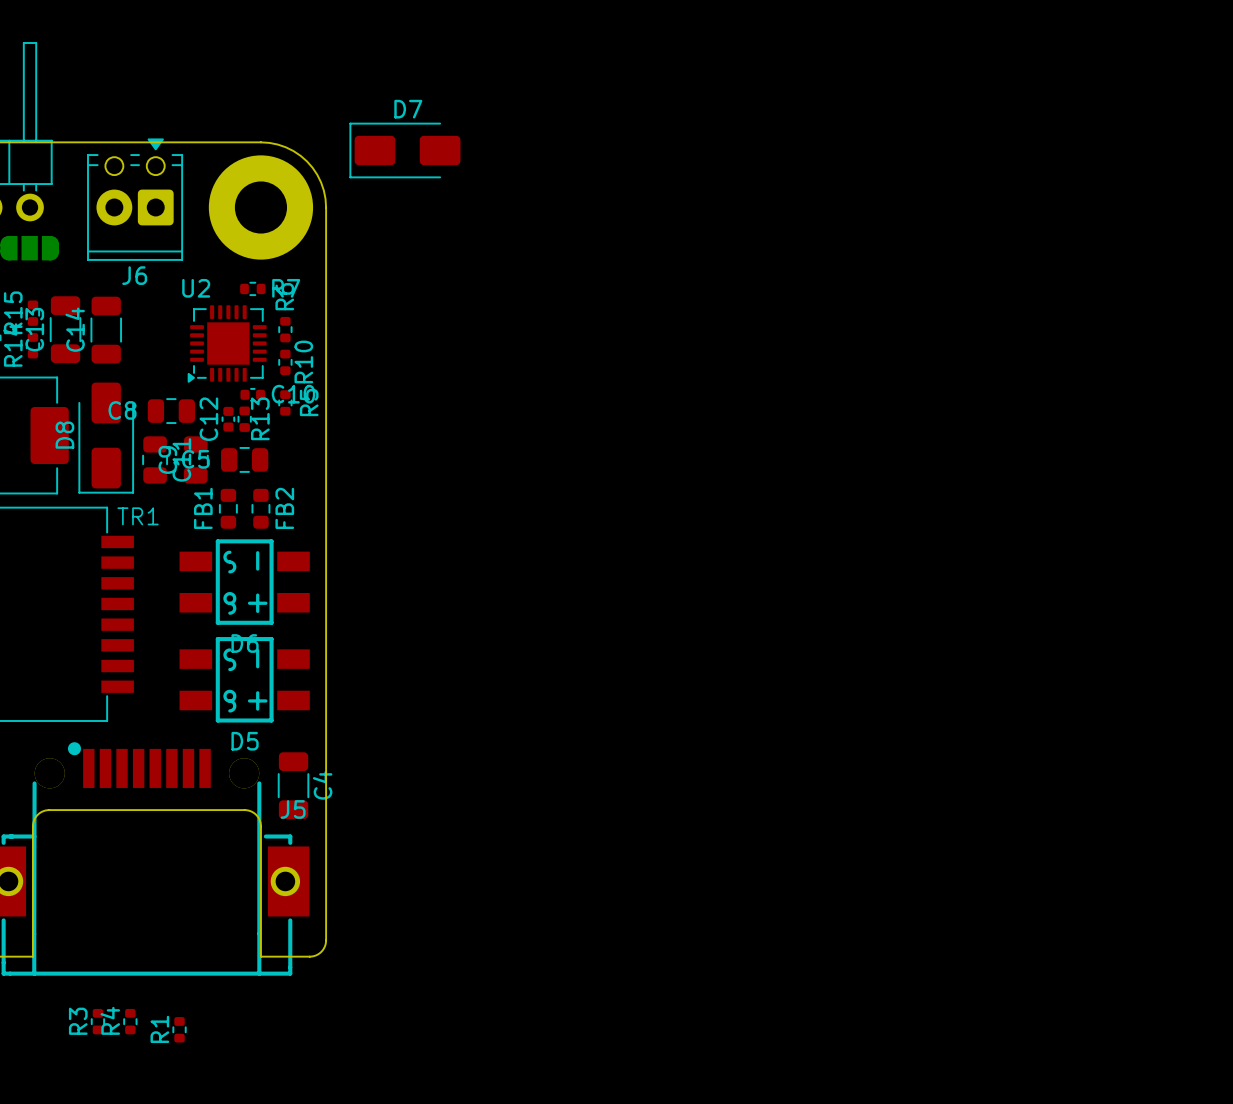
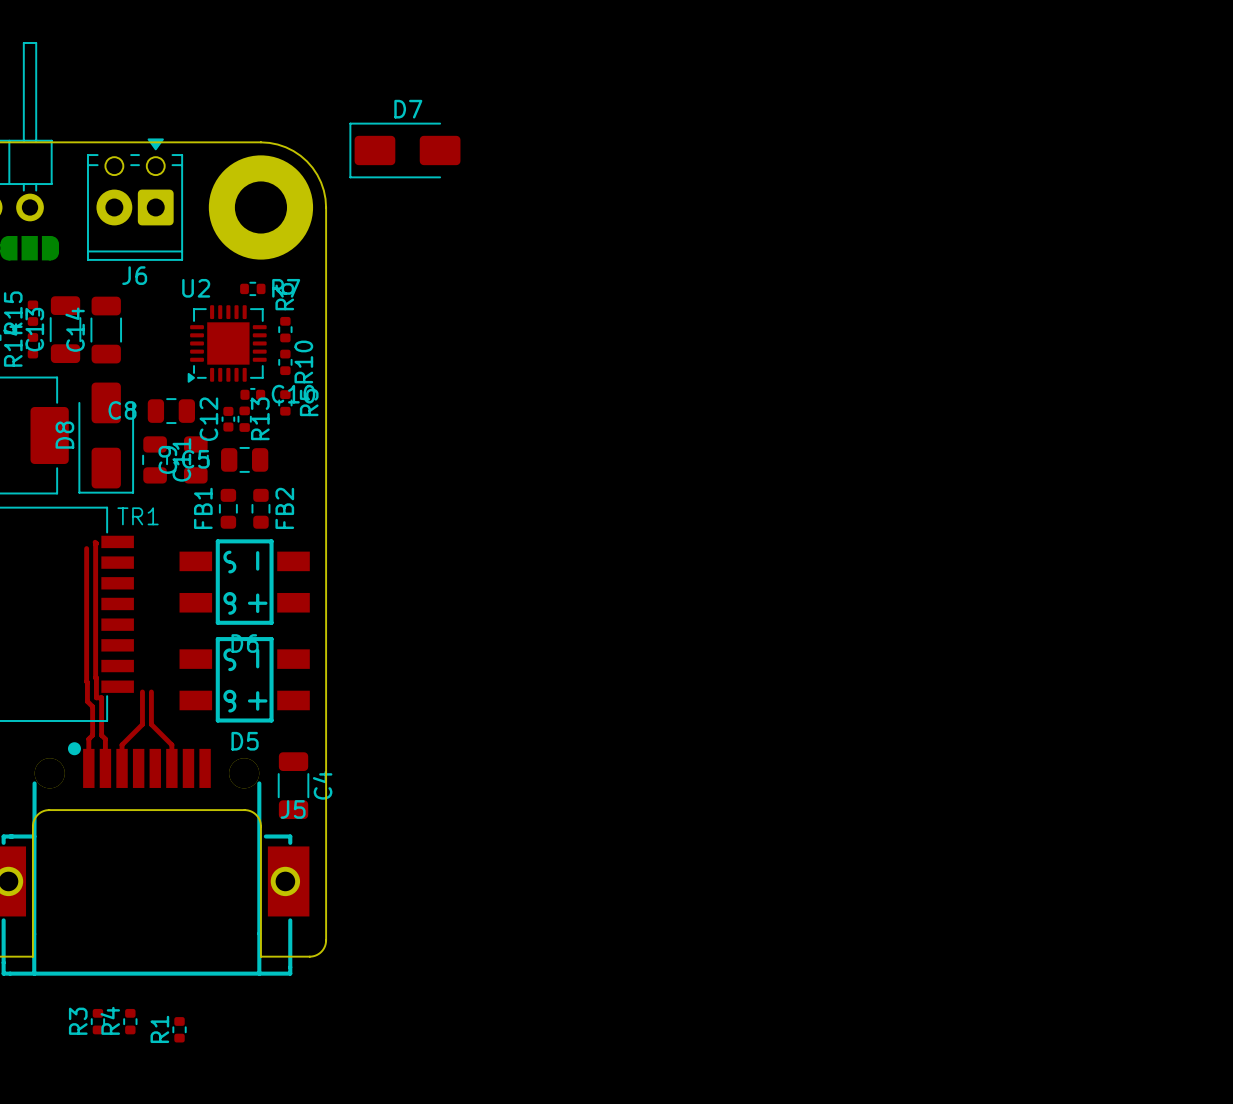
top track: none -> (95, 542) (96, 697) (101, 697) (101, 735) (105, 739) (105, 768)
top track: none -> (86, 548) (86, 681) (87, 701) (92, 706) (92, 735) (88, 739) (88, 768)
top track: none -> (142, 692) (142, 724) (122, 744) (122, 768)
top track: none -> (151, 692) (151, 724) (171, 744) (171, 768)

